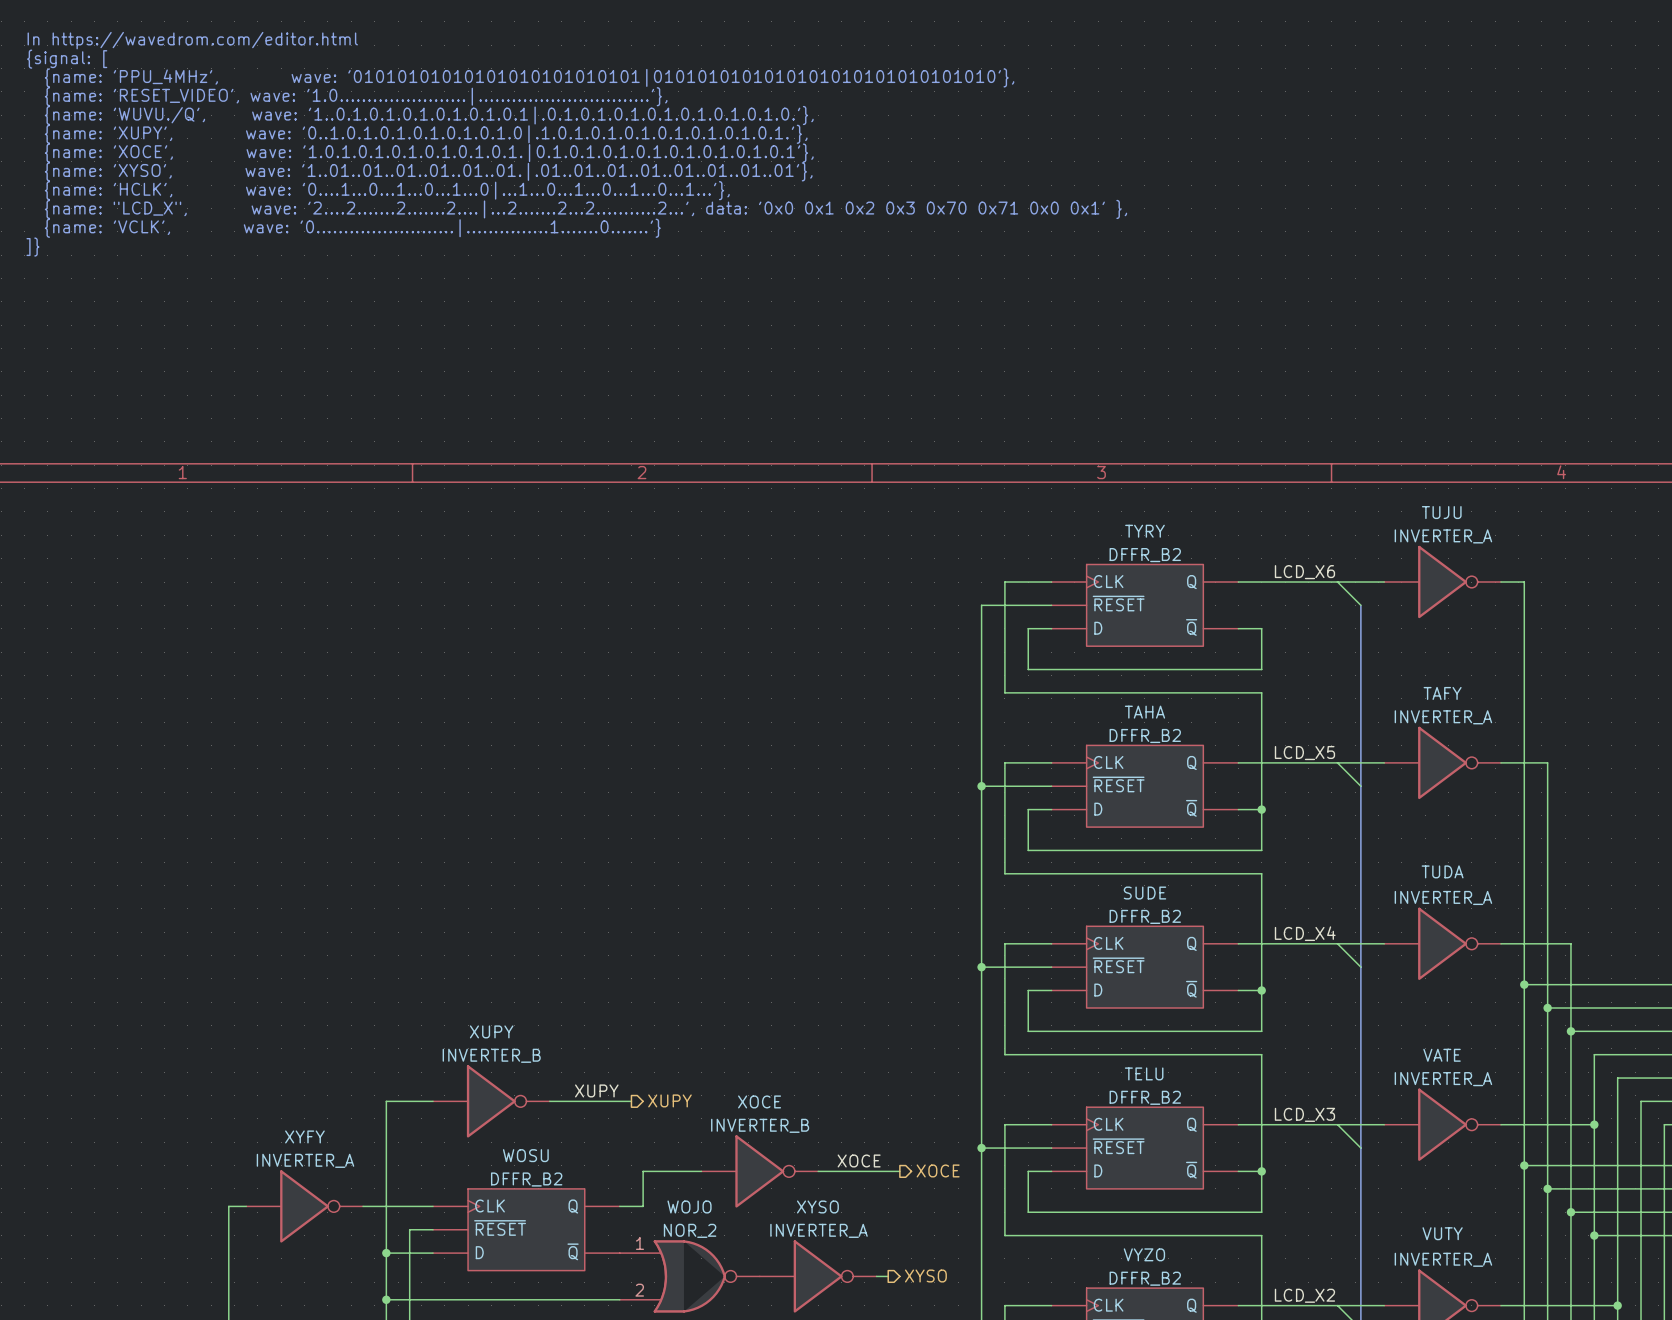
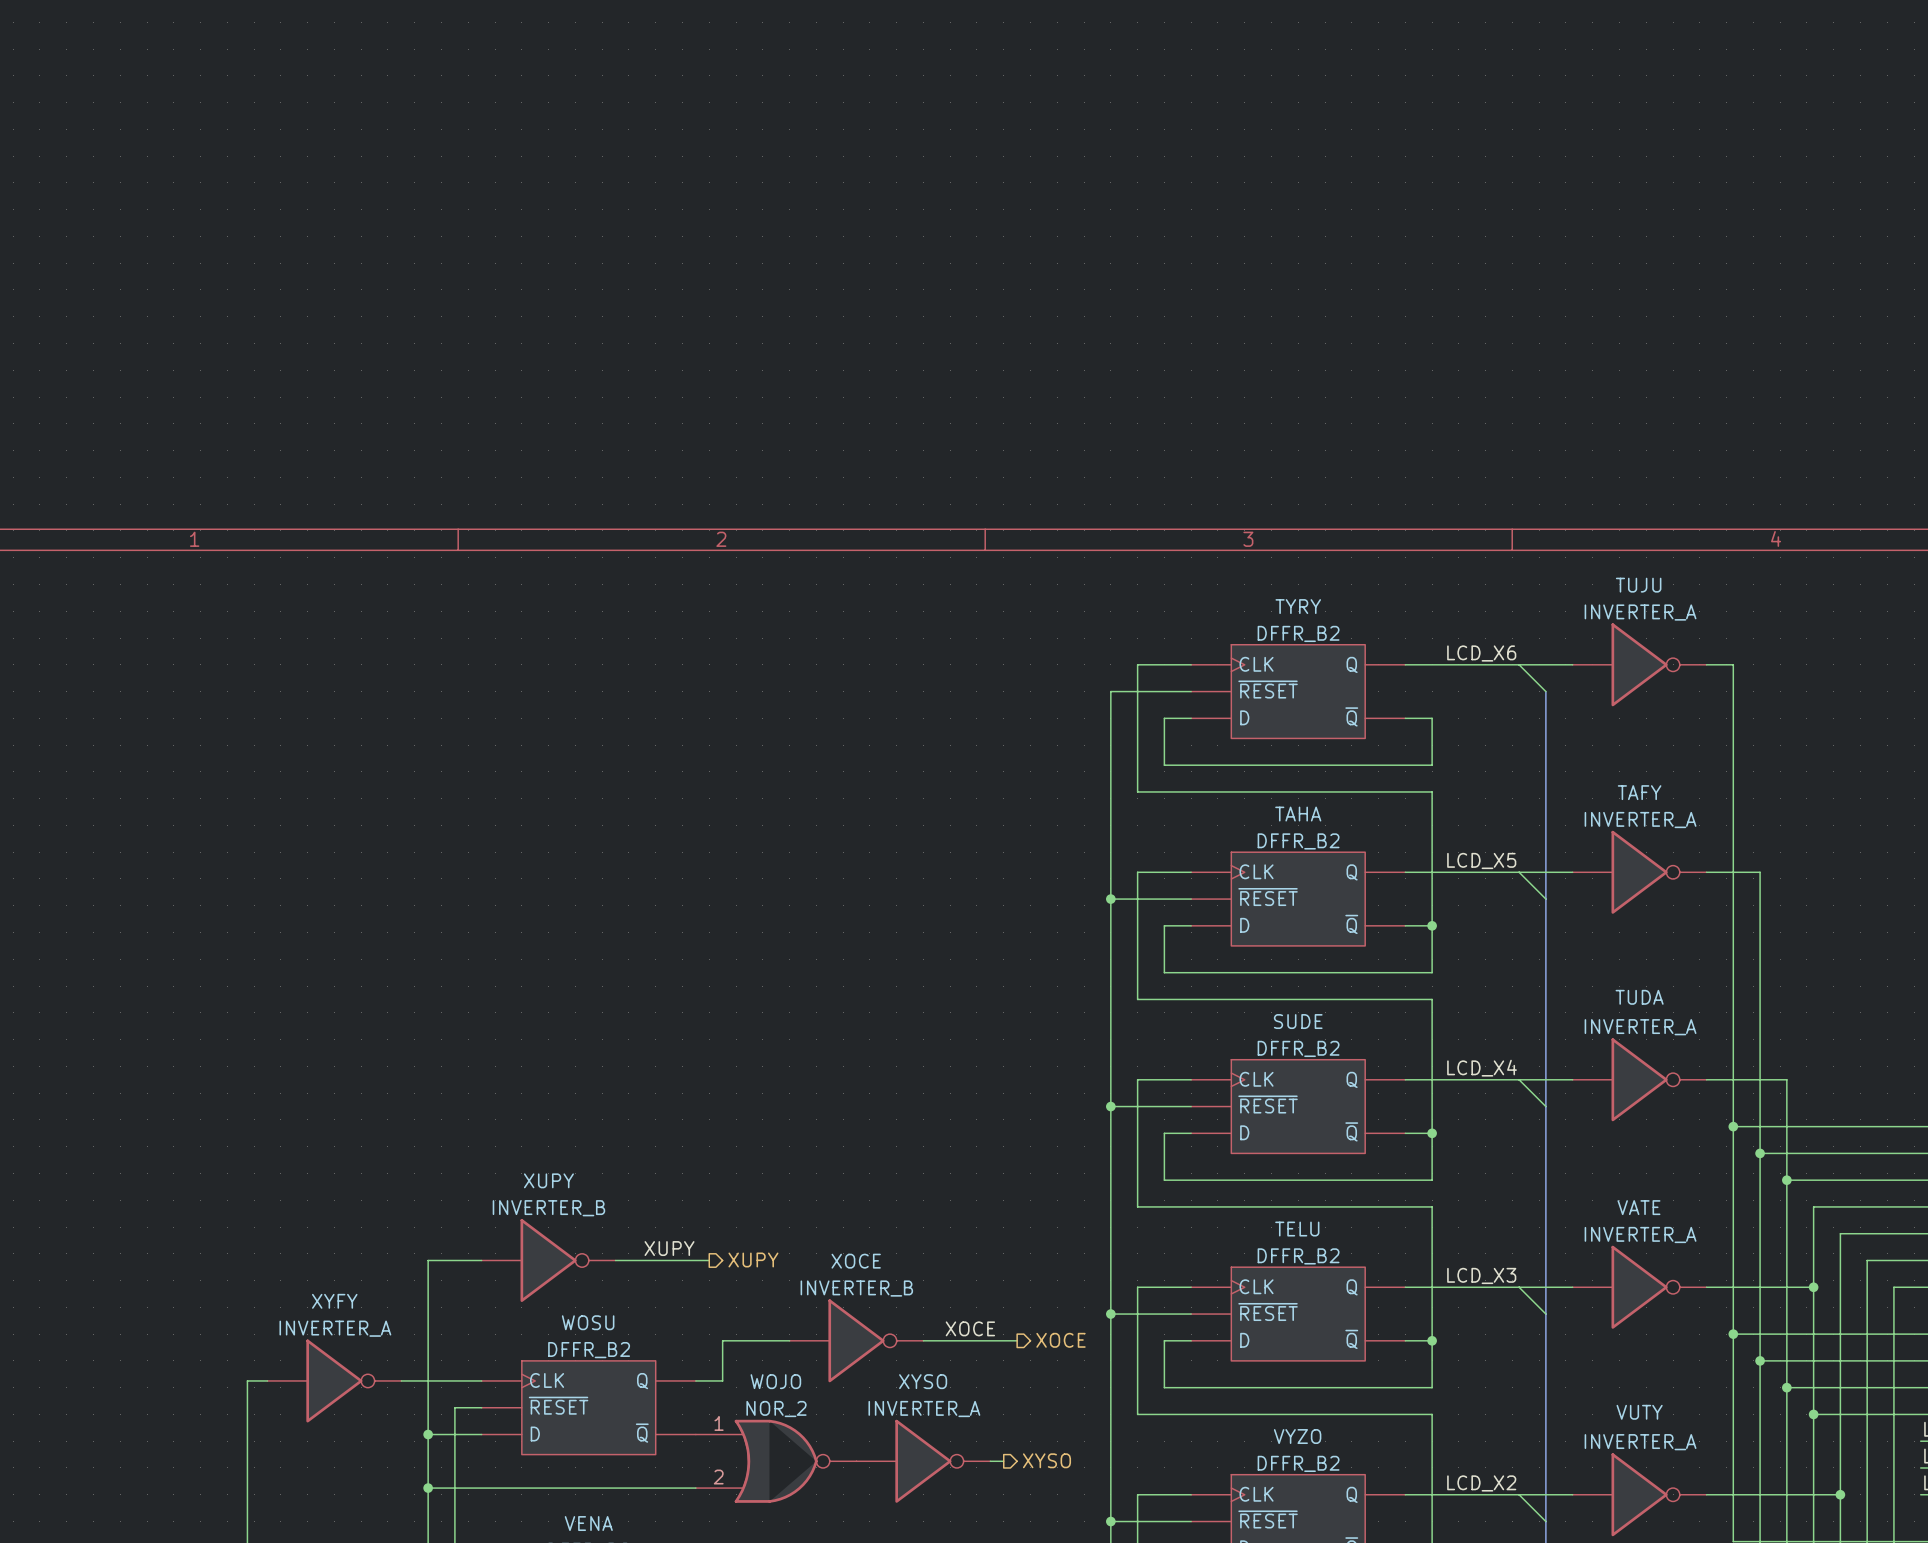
text: In https://wavedrom.com/editor.html (192, 40) -> none
text: {signal: [ (67, 59) -> none
text: {name: 'PPU_4MHz', wave: '01010101010101010101010101|0101010101010101010101010101010'}, (529, 77) -> none
text: {name: 'RESET_VIDEO', wave: '1.0.......................|...............................'}, (356, 96) -> none
text: {name: 'WUVU./Q', wave: '1..0.1.0.1.0.1.0.1.0.1.0.1|.0.1.0.1.0.1.0.1.0.1.0.1.0.1.0.'}, (429, 115) -> none
text: {name: 'XUPY', wave: '0..1.0.1.0.1.0.1.0.1.0.1.0|.1.0.1.0.1.0.1.0.1.0.1.0.1.0.1.'}, (426, 134) -> none
text: {name: 'XOCE', wave: '1.0.1.0.1.0.1.0.1.0.1.0.1.|0.1.0.1.0.1.0.1.0.1.0.1.0.1.0.1'}, (429, 153) -> none
text: {name: 'XYSO', wave: '1..01..01..01..01..01..01.|.01..01..01..01..01..01..01..01'}, (428, 171) -> none
text: {name: 'HCLK', wave: '0....1...0...1...0...1...0|...1...0...1...0...1...0...1...'}, (387, 190) -> none
text: {name: "LCD_X", wave: '2....2.......2.......2....|...2.......2...2...........2...', data: '0x0 0x1 0x2 0x3 0x70 0x71 0x0 0x1' }, (585, 209) -> none
text: {name: 'VCLK', wave: '0.........................|...............1.......0.......'} (352, 228) -> none
text: ]} (32, 247) -> none

